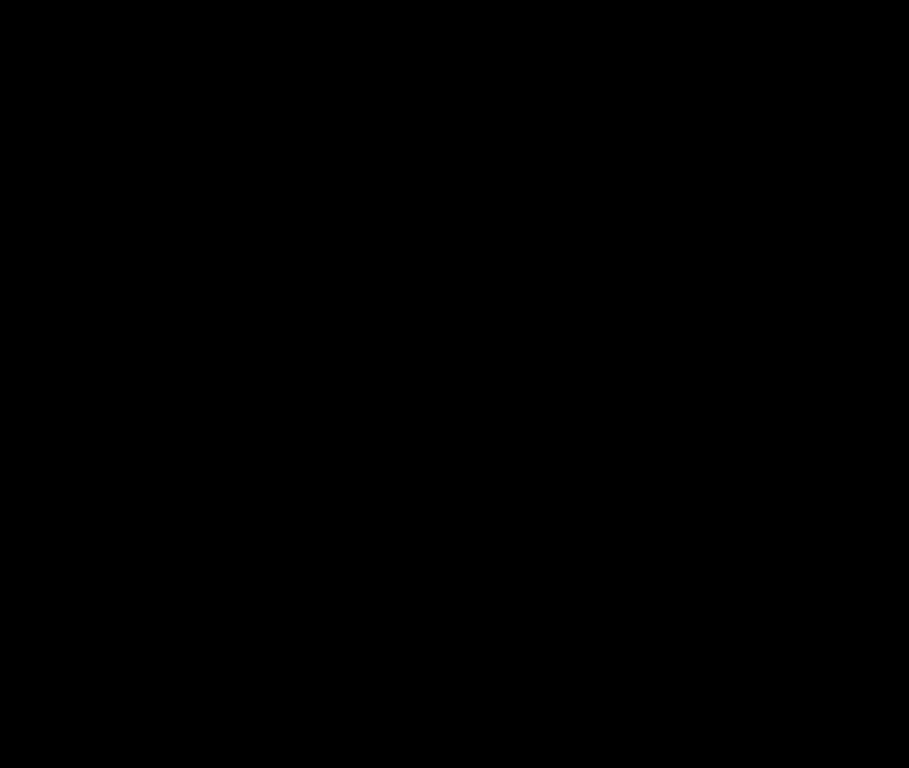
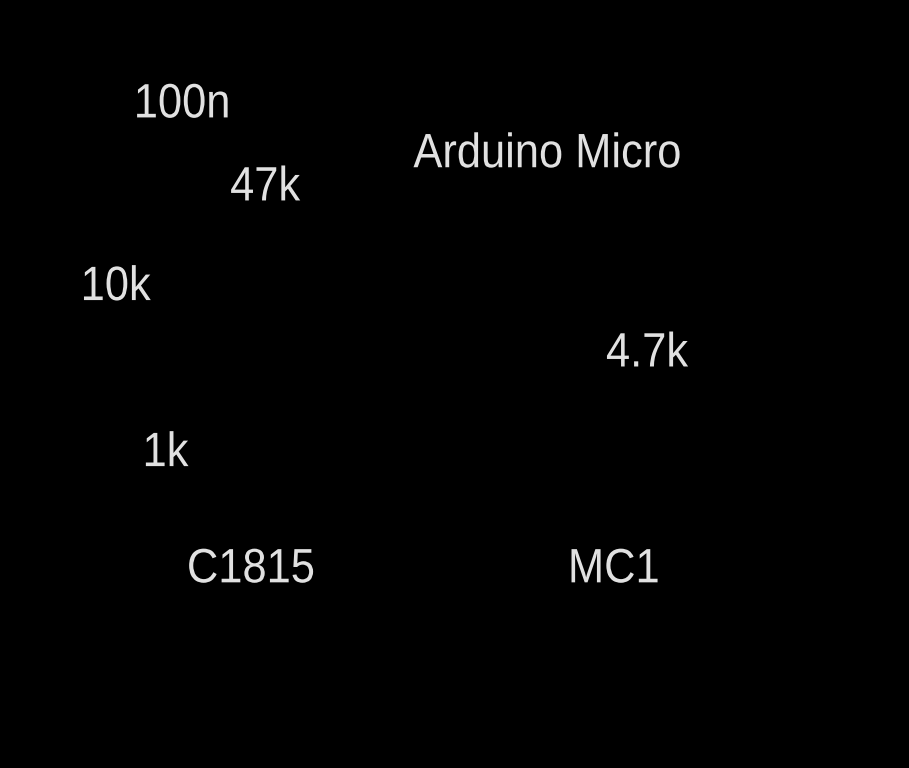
text: none -> 100n (182, 100)
text: none -> Arduino Micro (546, 149)
text: none -> 47k (265, 182)
text: none -> 10k (117, 282)
text: none -> 4.7k (647, 348)
text: none -> 1k (167, 448)
text: none -> C1815 (251, 565)
text: none -> MC1 (614, 565)

